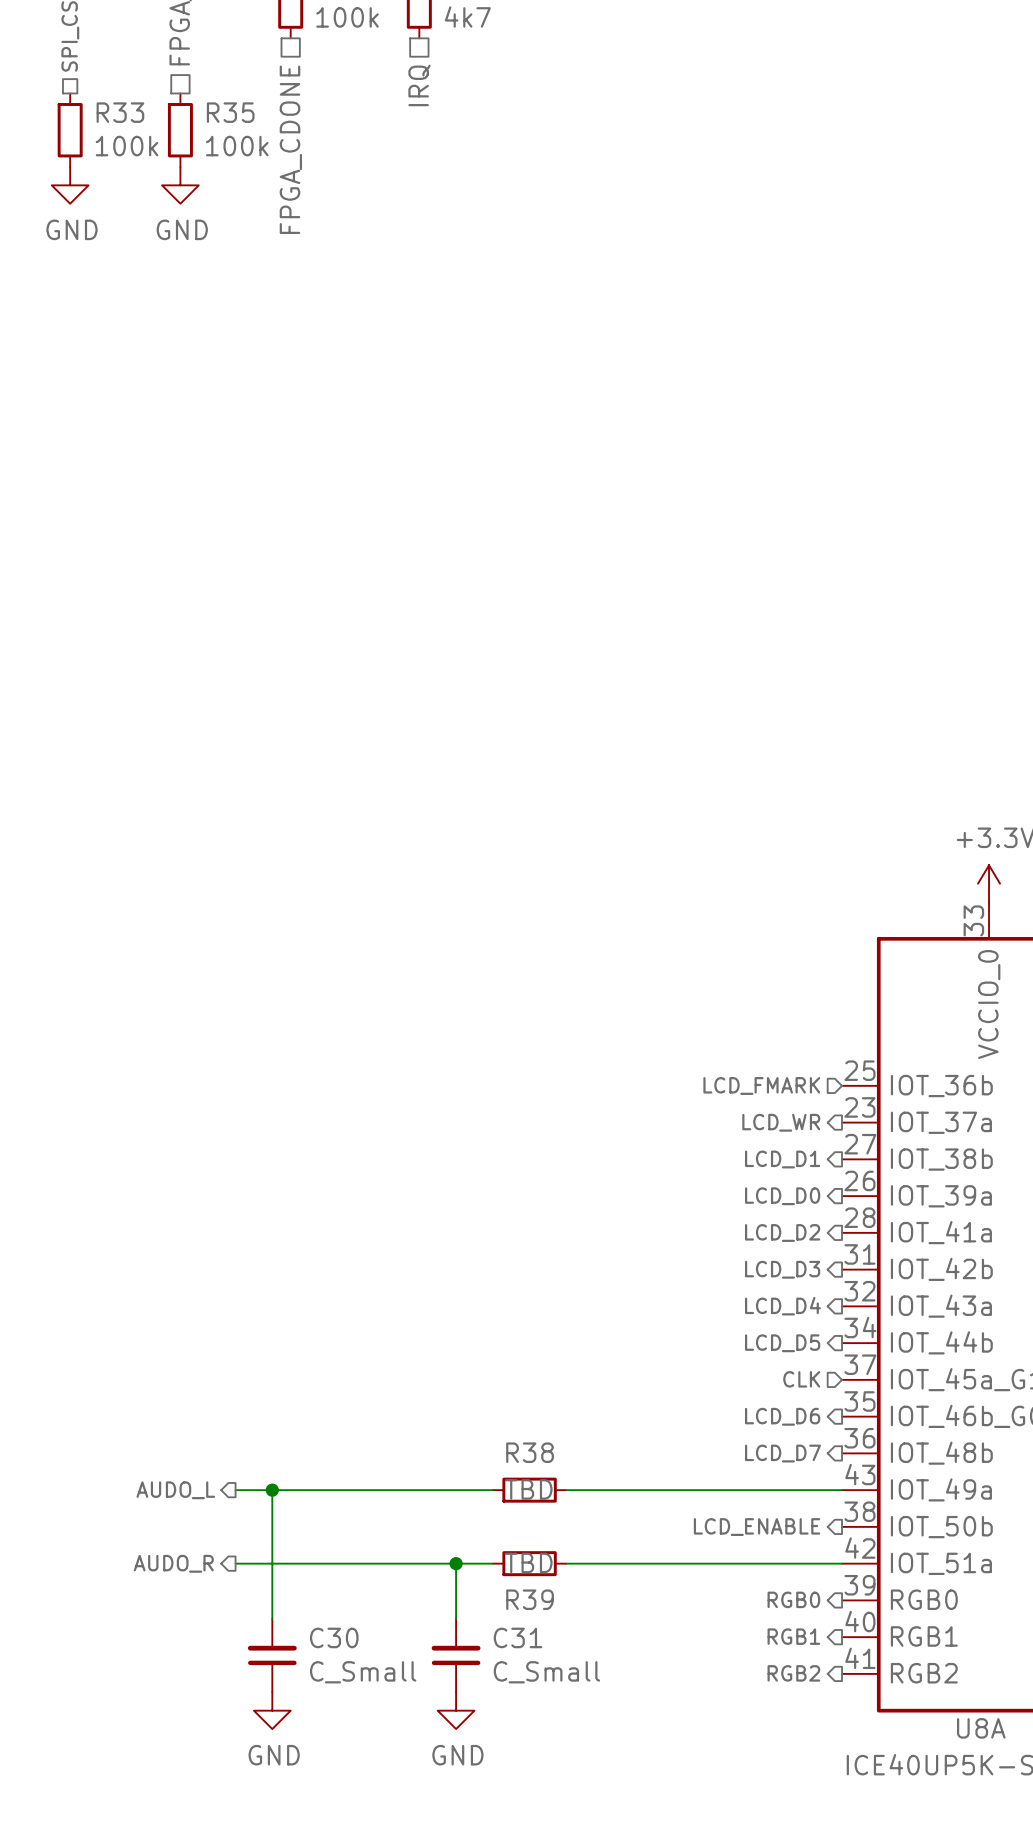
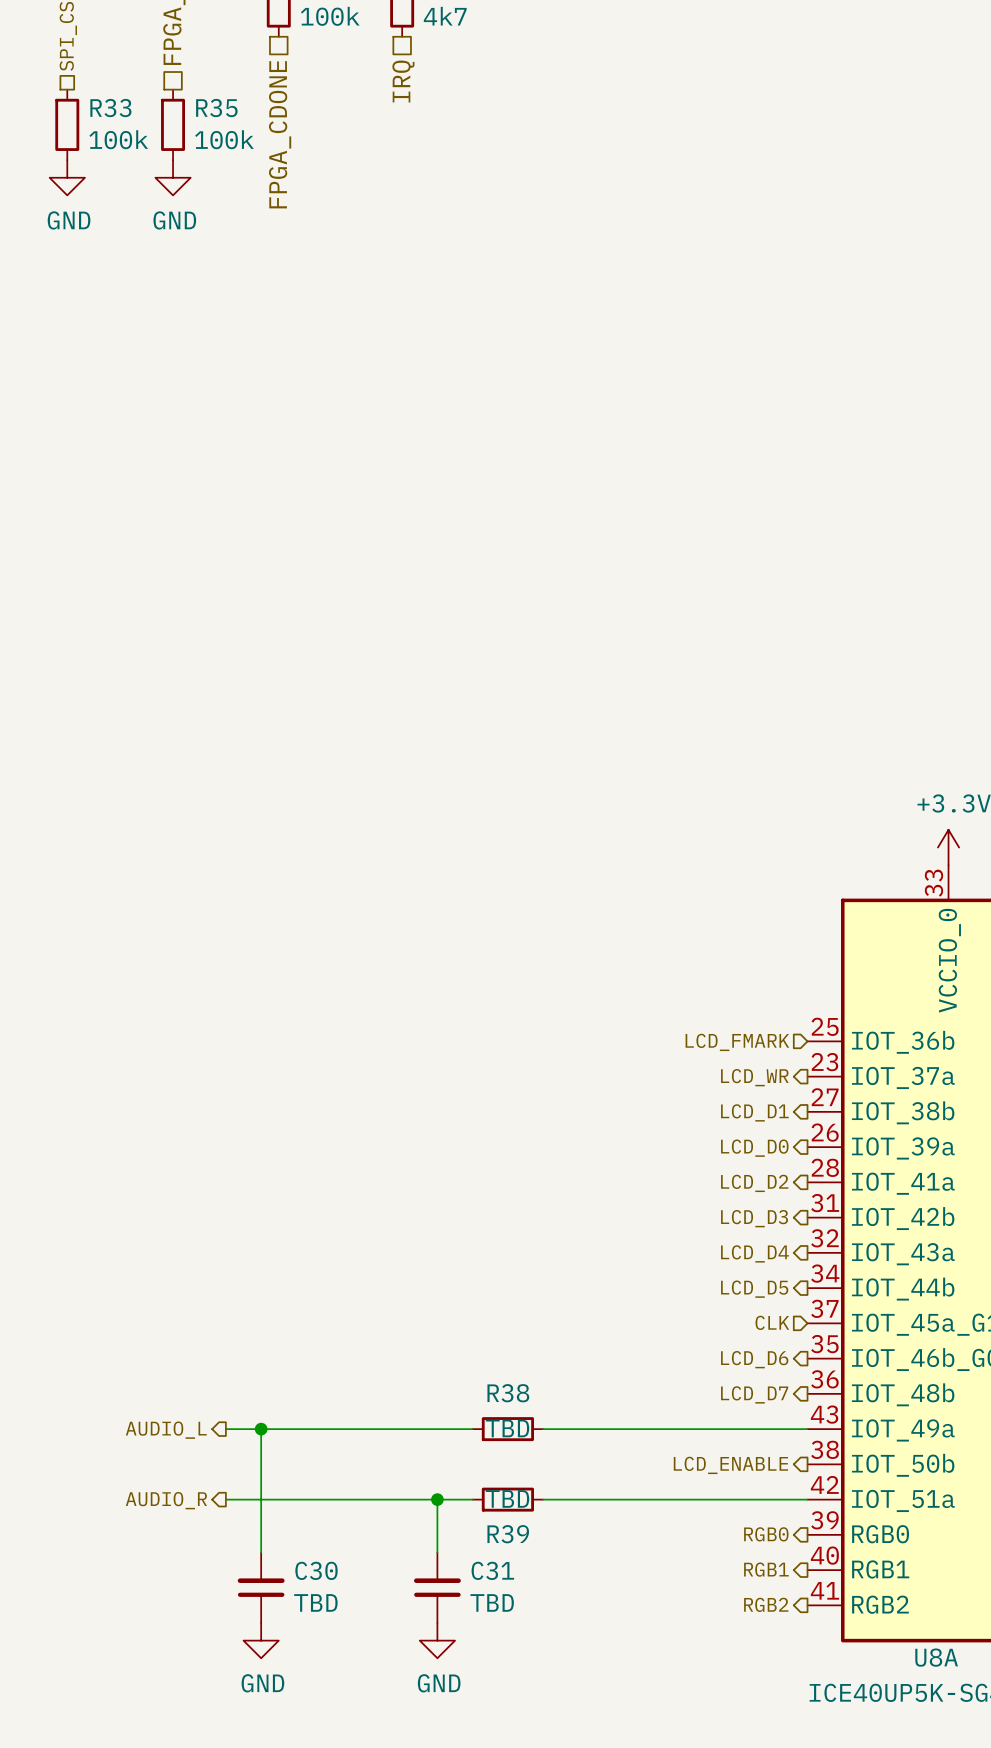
hierarchical label: AUDO_L (175, 1490) -> AUDIO_L (166, 1430)
hierarchical label: AUDO_R (173, 1563) -> AUDIO_R (166, 1500)
C30 value: C_Small (363, 1672) -> TBD (315, 1602)
C31 value: C_Small (546, 1672) -> TBD (492, 1602)

